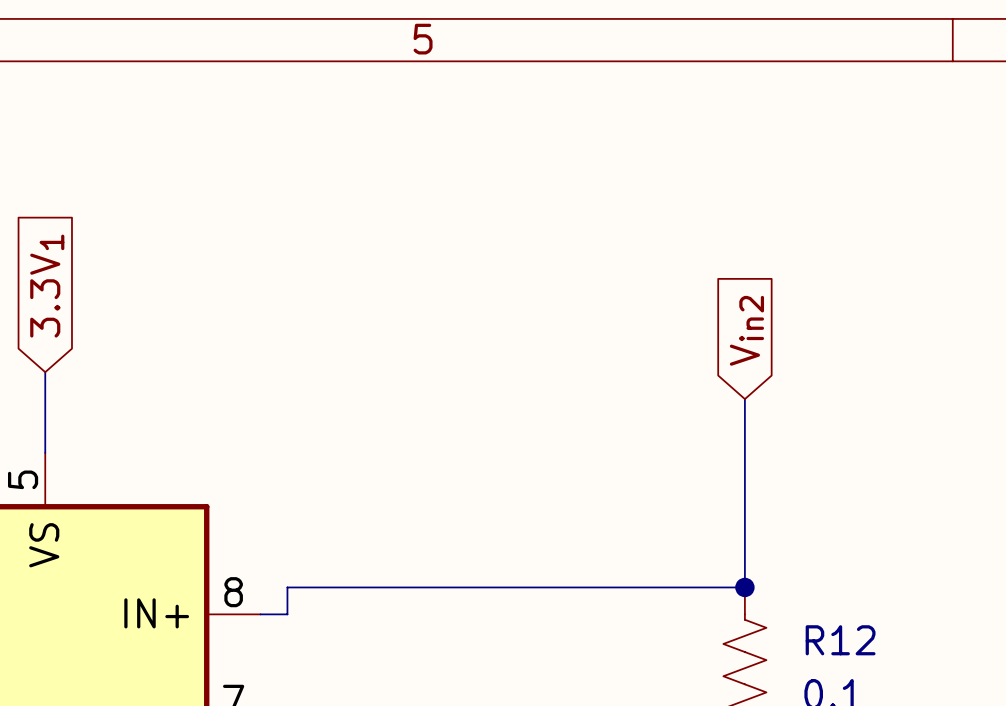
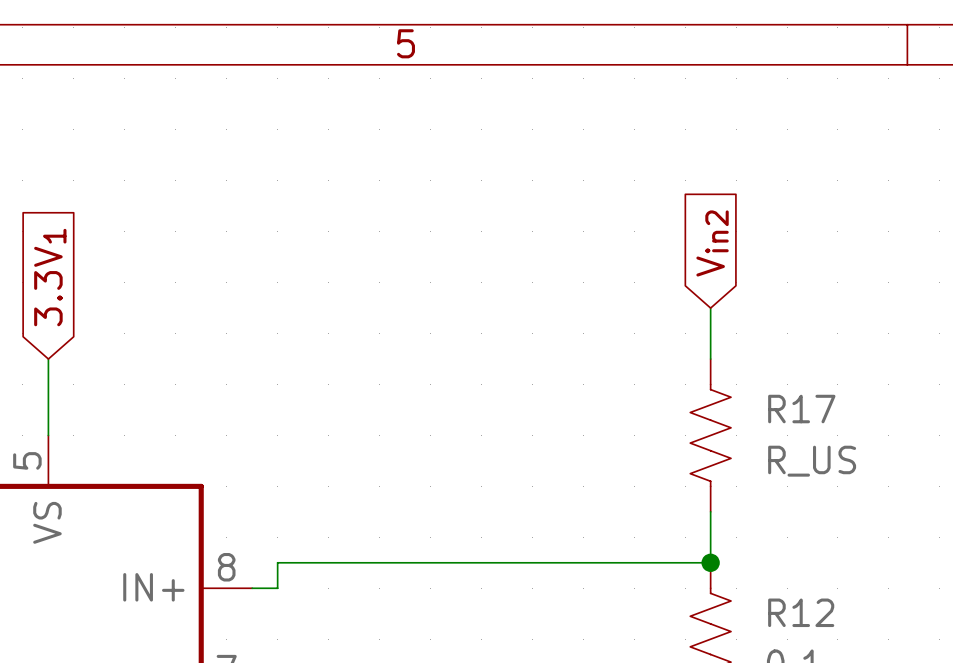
wire: none -> (710, 308) (710, 359)
global label position: Vin2 (746, 330) -> Vin2 (712, 243)
wire: (744, 399) (744, 533) -> none
R17: none -> R_US (710, 435)

